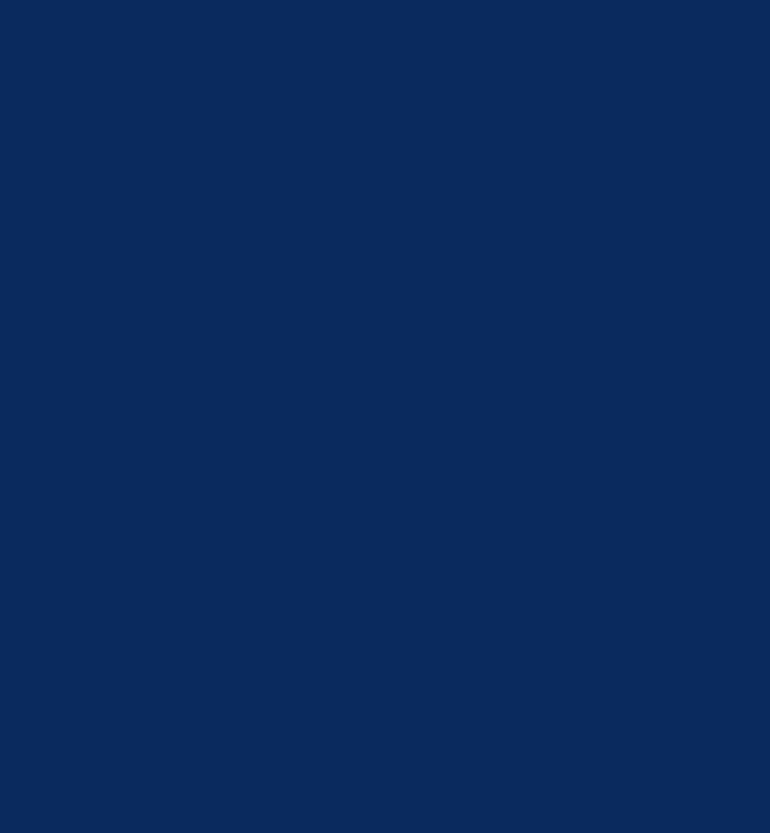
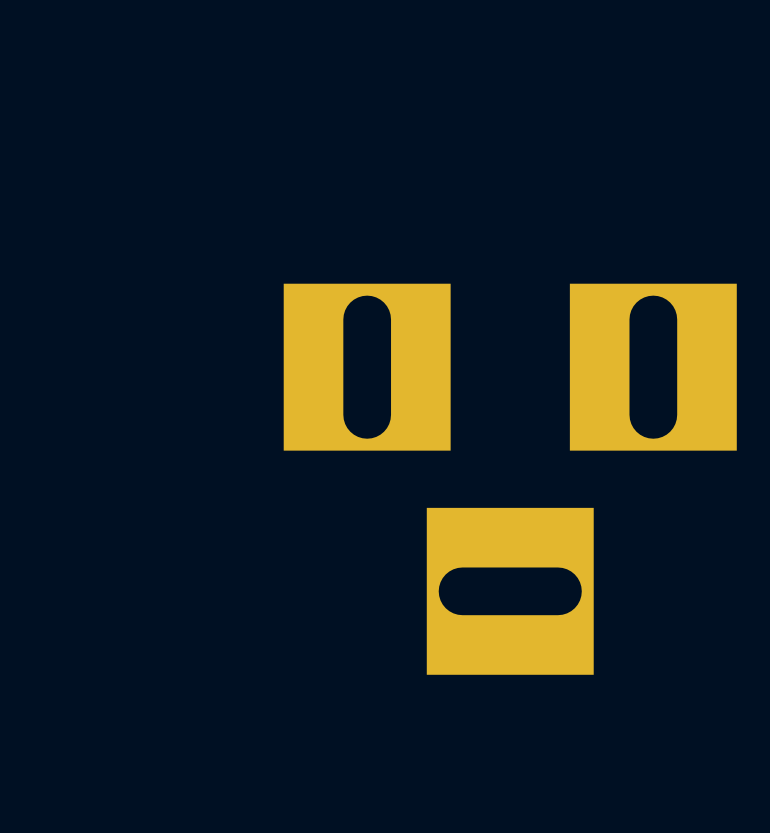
part: none -> (510, 479)

